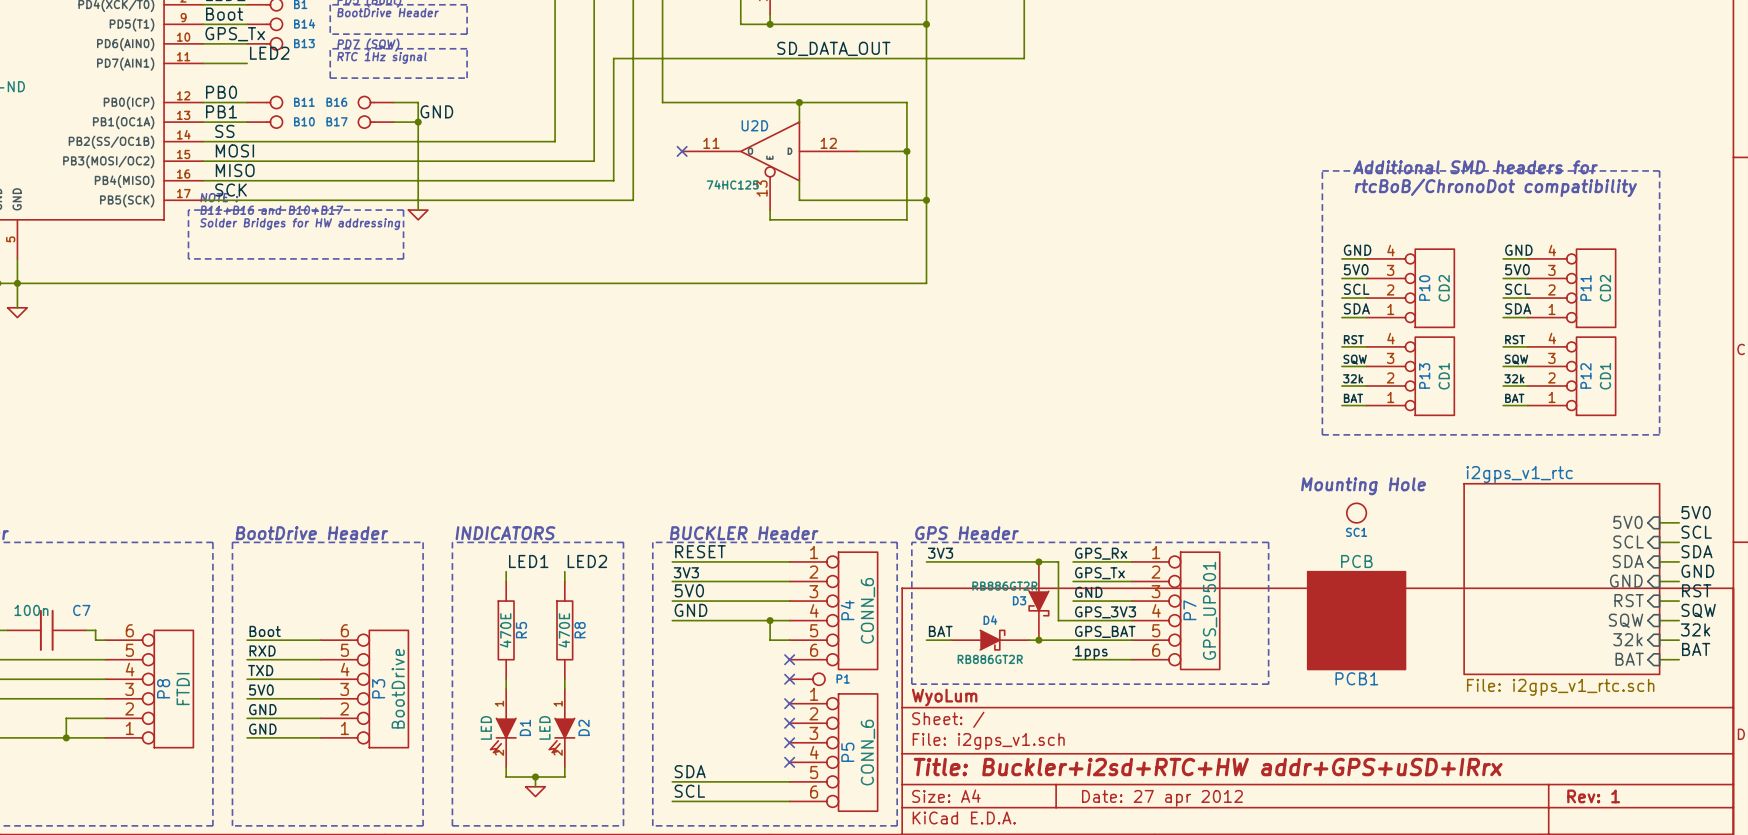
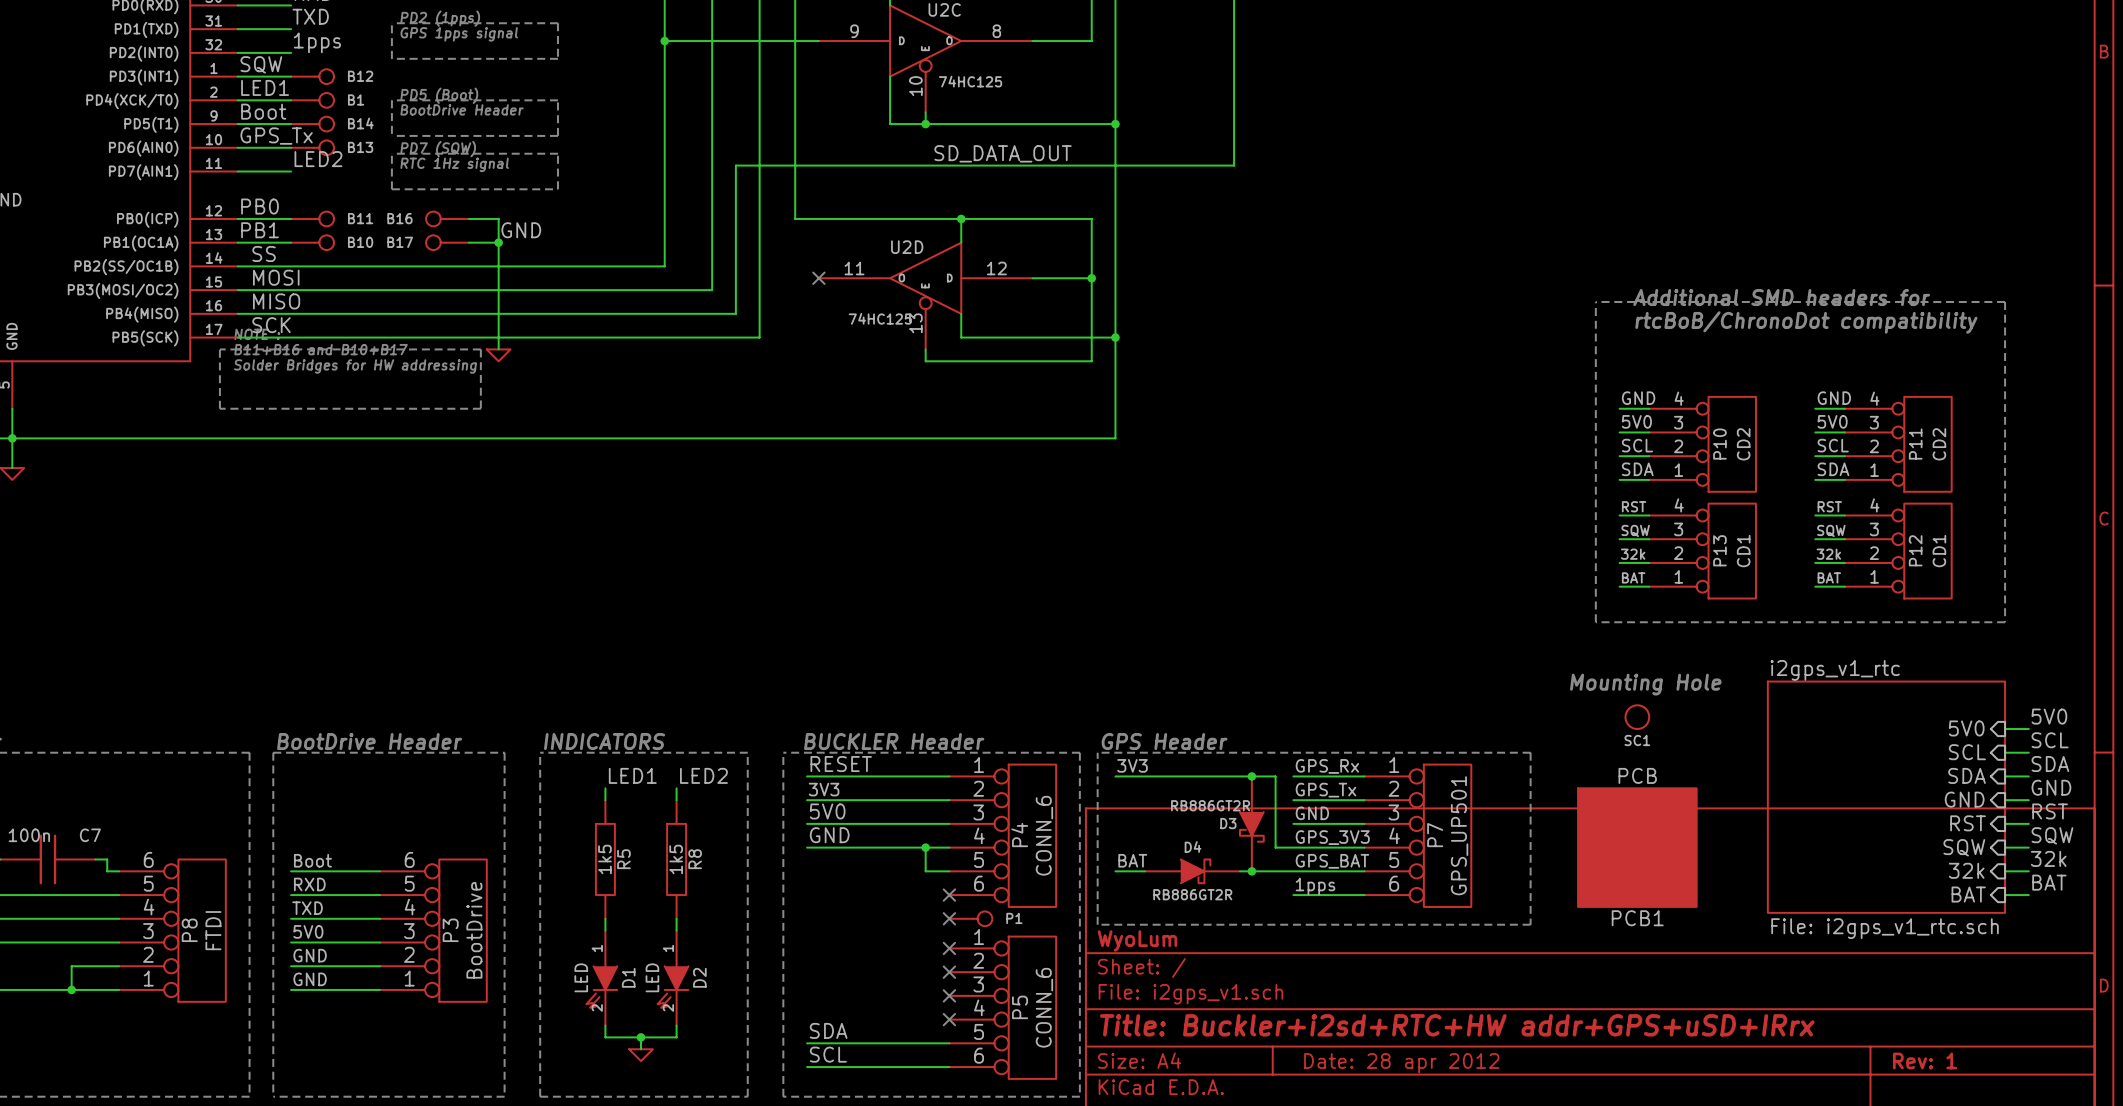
R5 value: 470E (505, 630) -> 1k5 (604, 859)
R8 value: 470E (564, 630) -> 1k5 (676, 859)
title block: Date: 27 apr 2012 (1162, 798) -> Date: 28 apr 2012 (1401, 1063)

